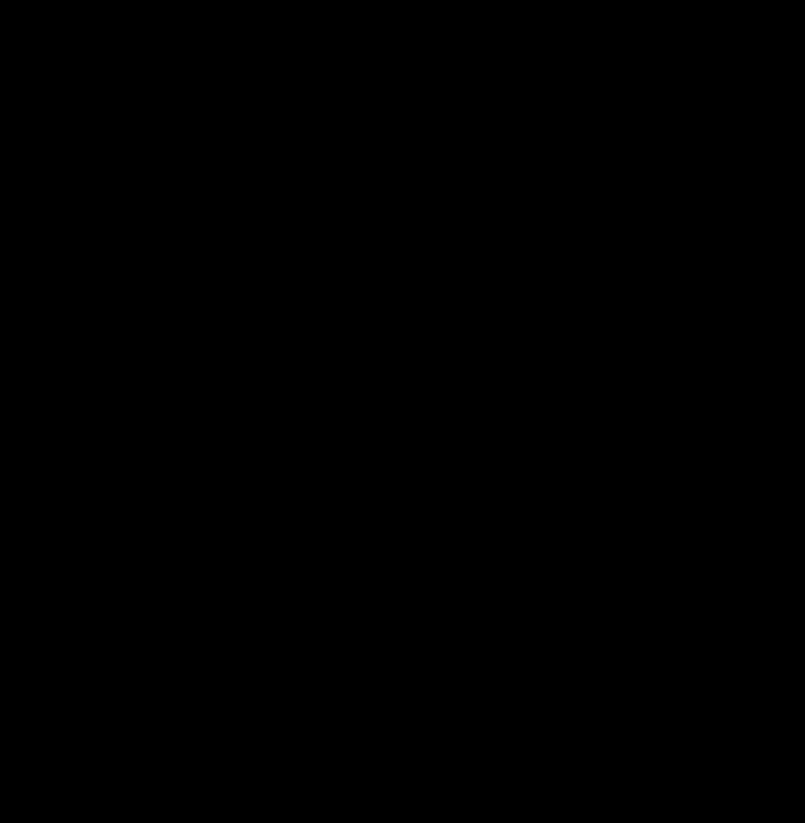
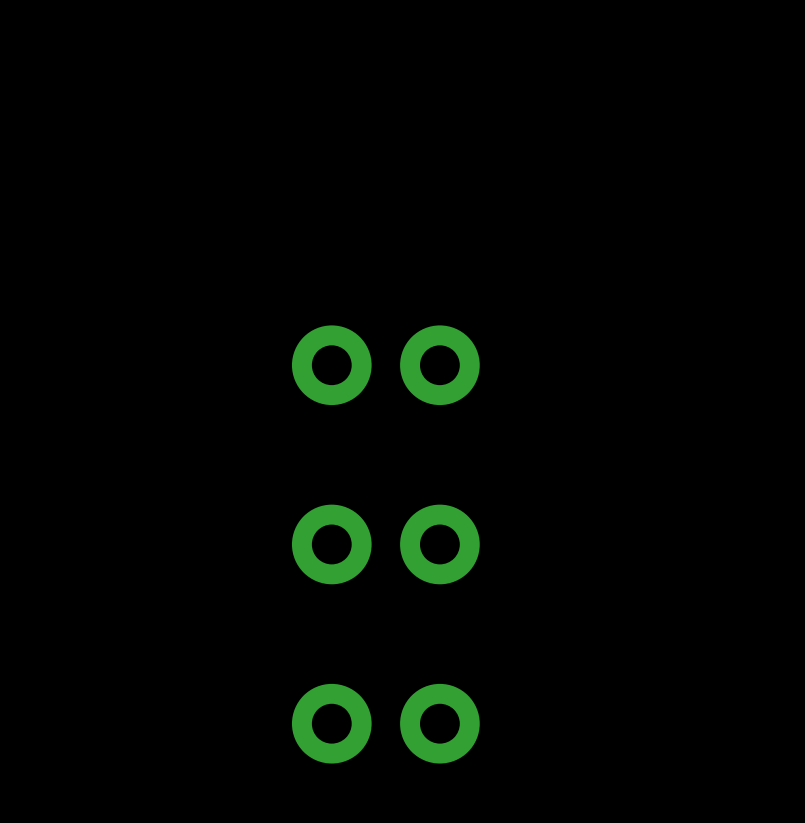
part: none -> (385, 365)
part: none -> (385, 544)
part: none -> (385, 723)

